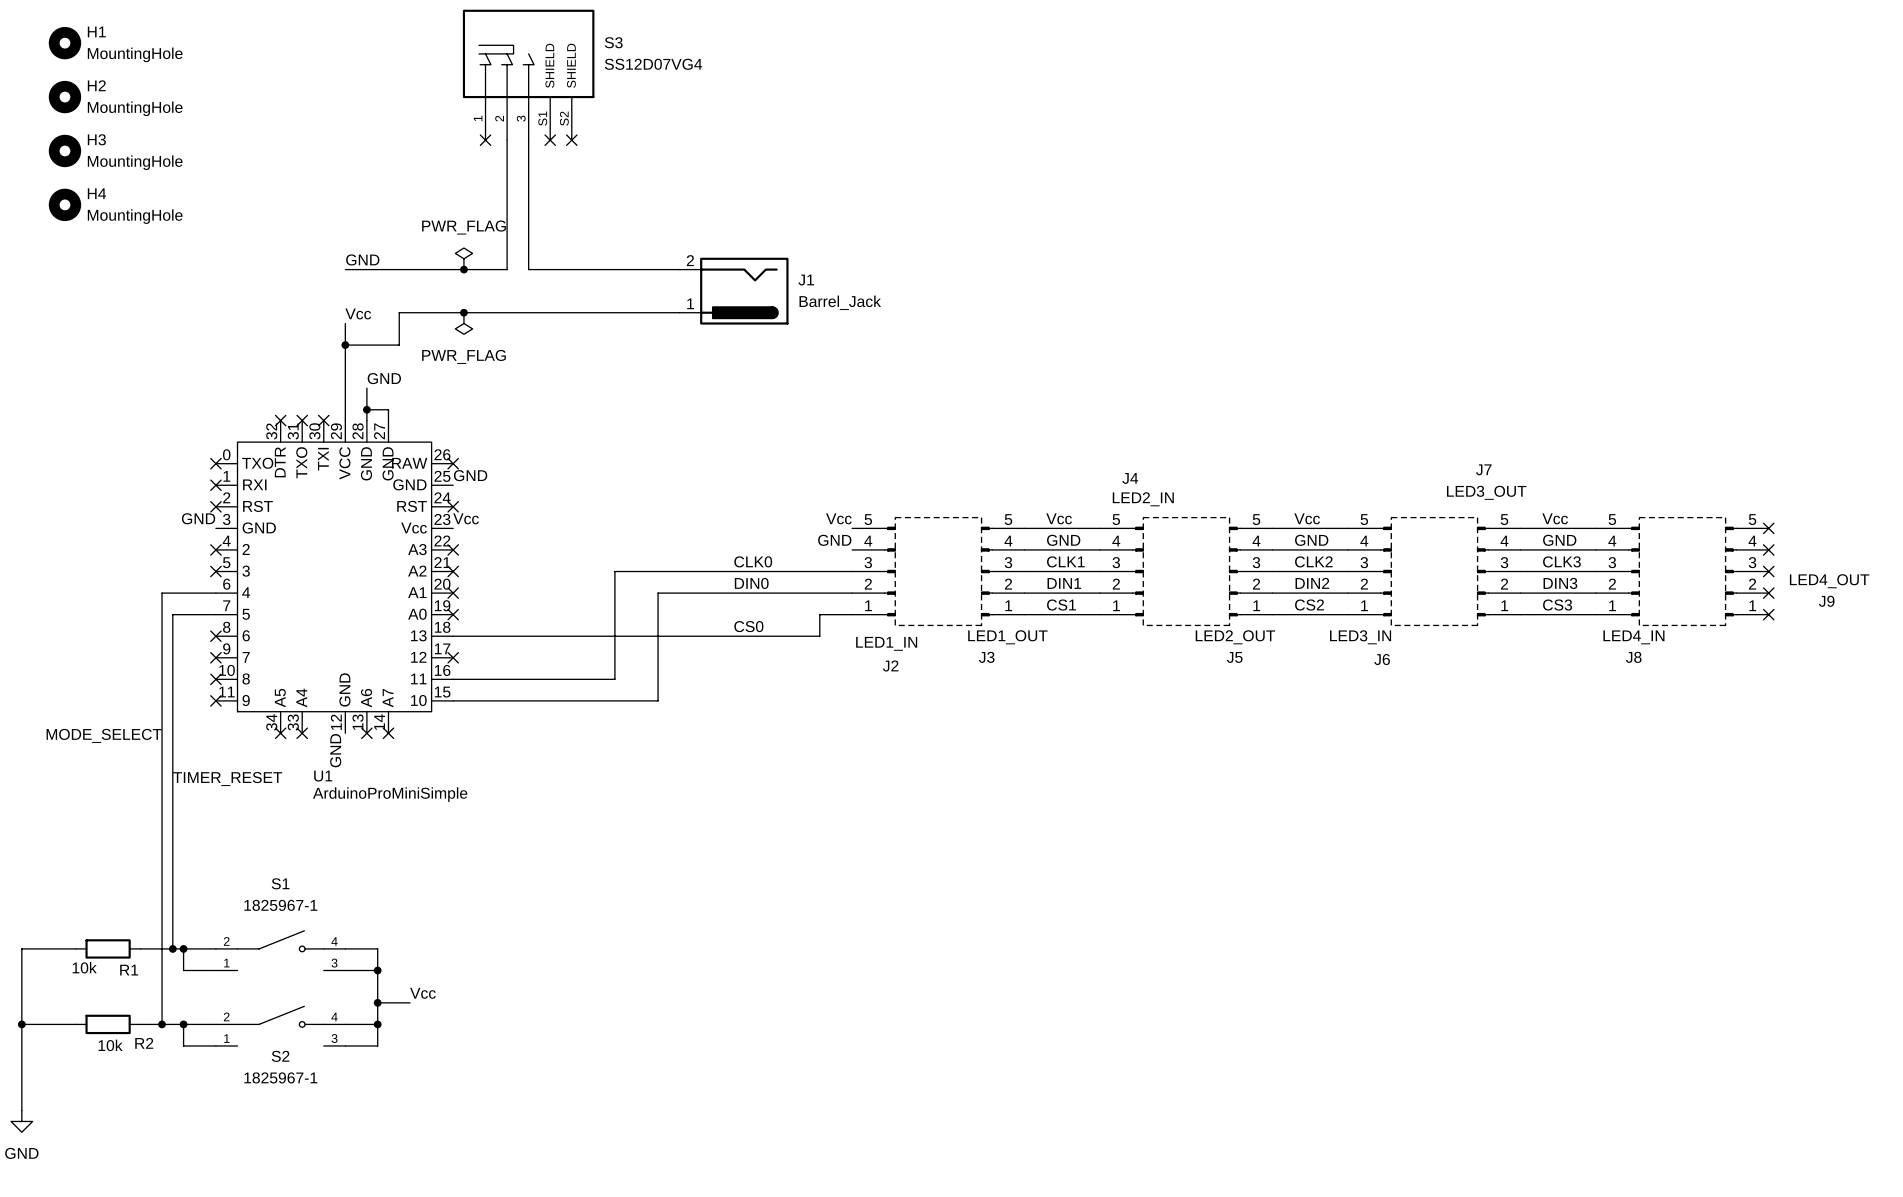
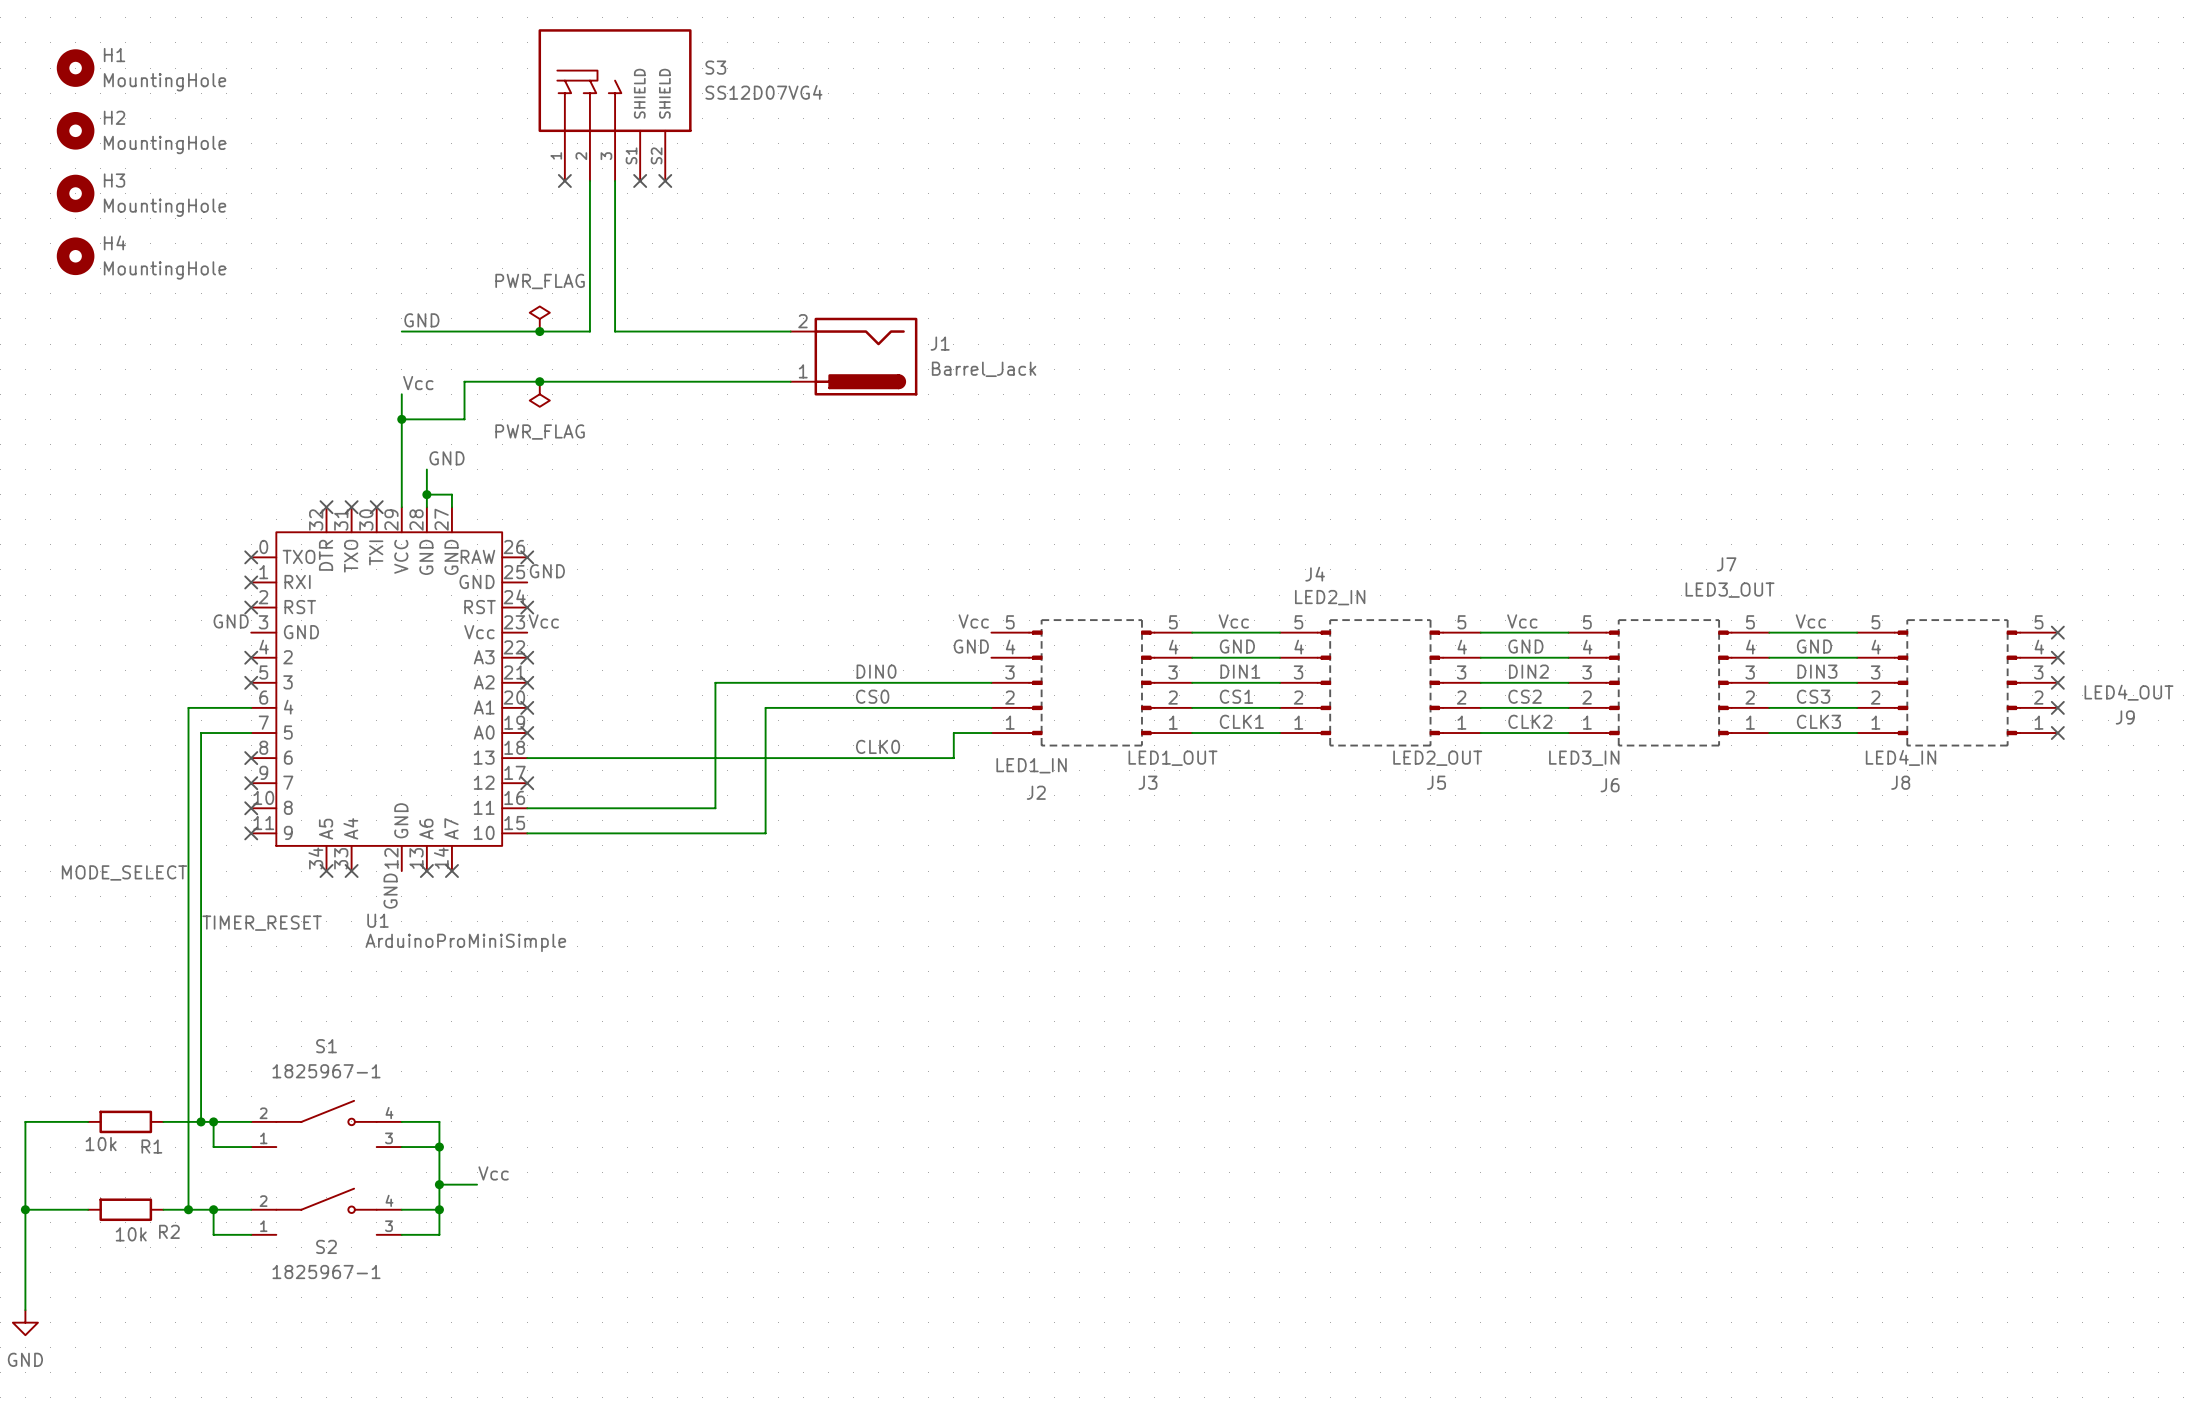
label: CLK0 (753, 561) -> DIN0 (876, 671)
label: CLK1 (1065, 561) -> DIN1 (1240, 671)
label: CLK2 (1313, 561) -> DIN2 (1528, 671)
label: CLK3 (1561, 561) -> DIN3 (1817, 671)
label: DIN0 (751, 583) -> CS0 (872, 696)
label: DIN1 (1064, 583) -> CS1 (1236, 696)
label: DIN2 (1312, 583) -> CS2 (1525, 696)
label: DIN3 (1560, 583) -> CS3 (1813, 696)
label: CS1 (1061, 605) -> CLK1 (1241, 721)
label: CS2 (1309, 605) -> CLK2 (1530, 721)
label: CS3 (1557, 605) -> CLK3 (1818, 721)
label: CS0 (748, 626) -> CLK0 (878, 746)

